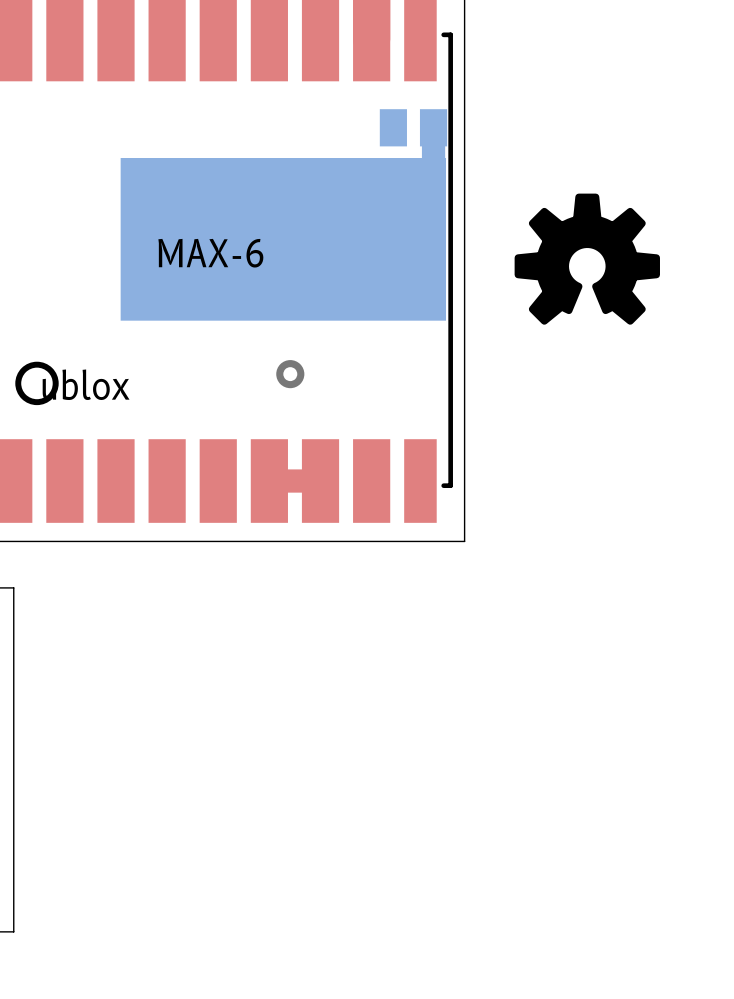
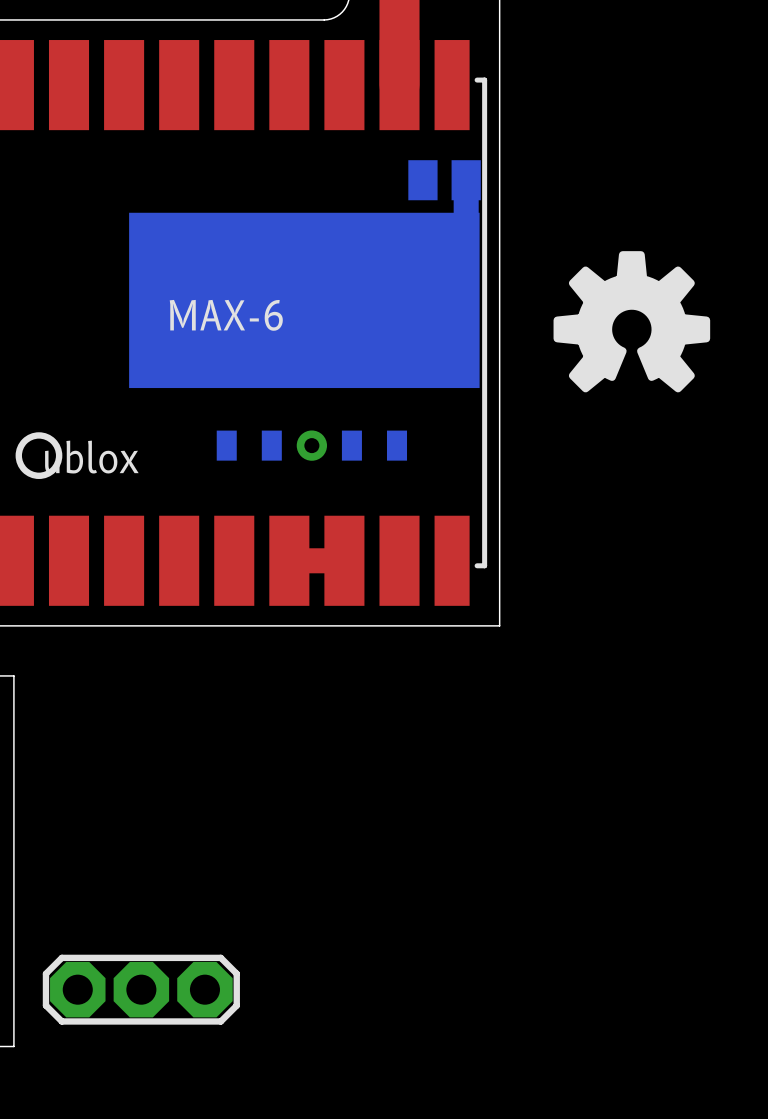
part: none -> (249, 445)
part: none -> (374, 445)
part: none -> (141, 989)

